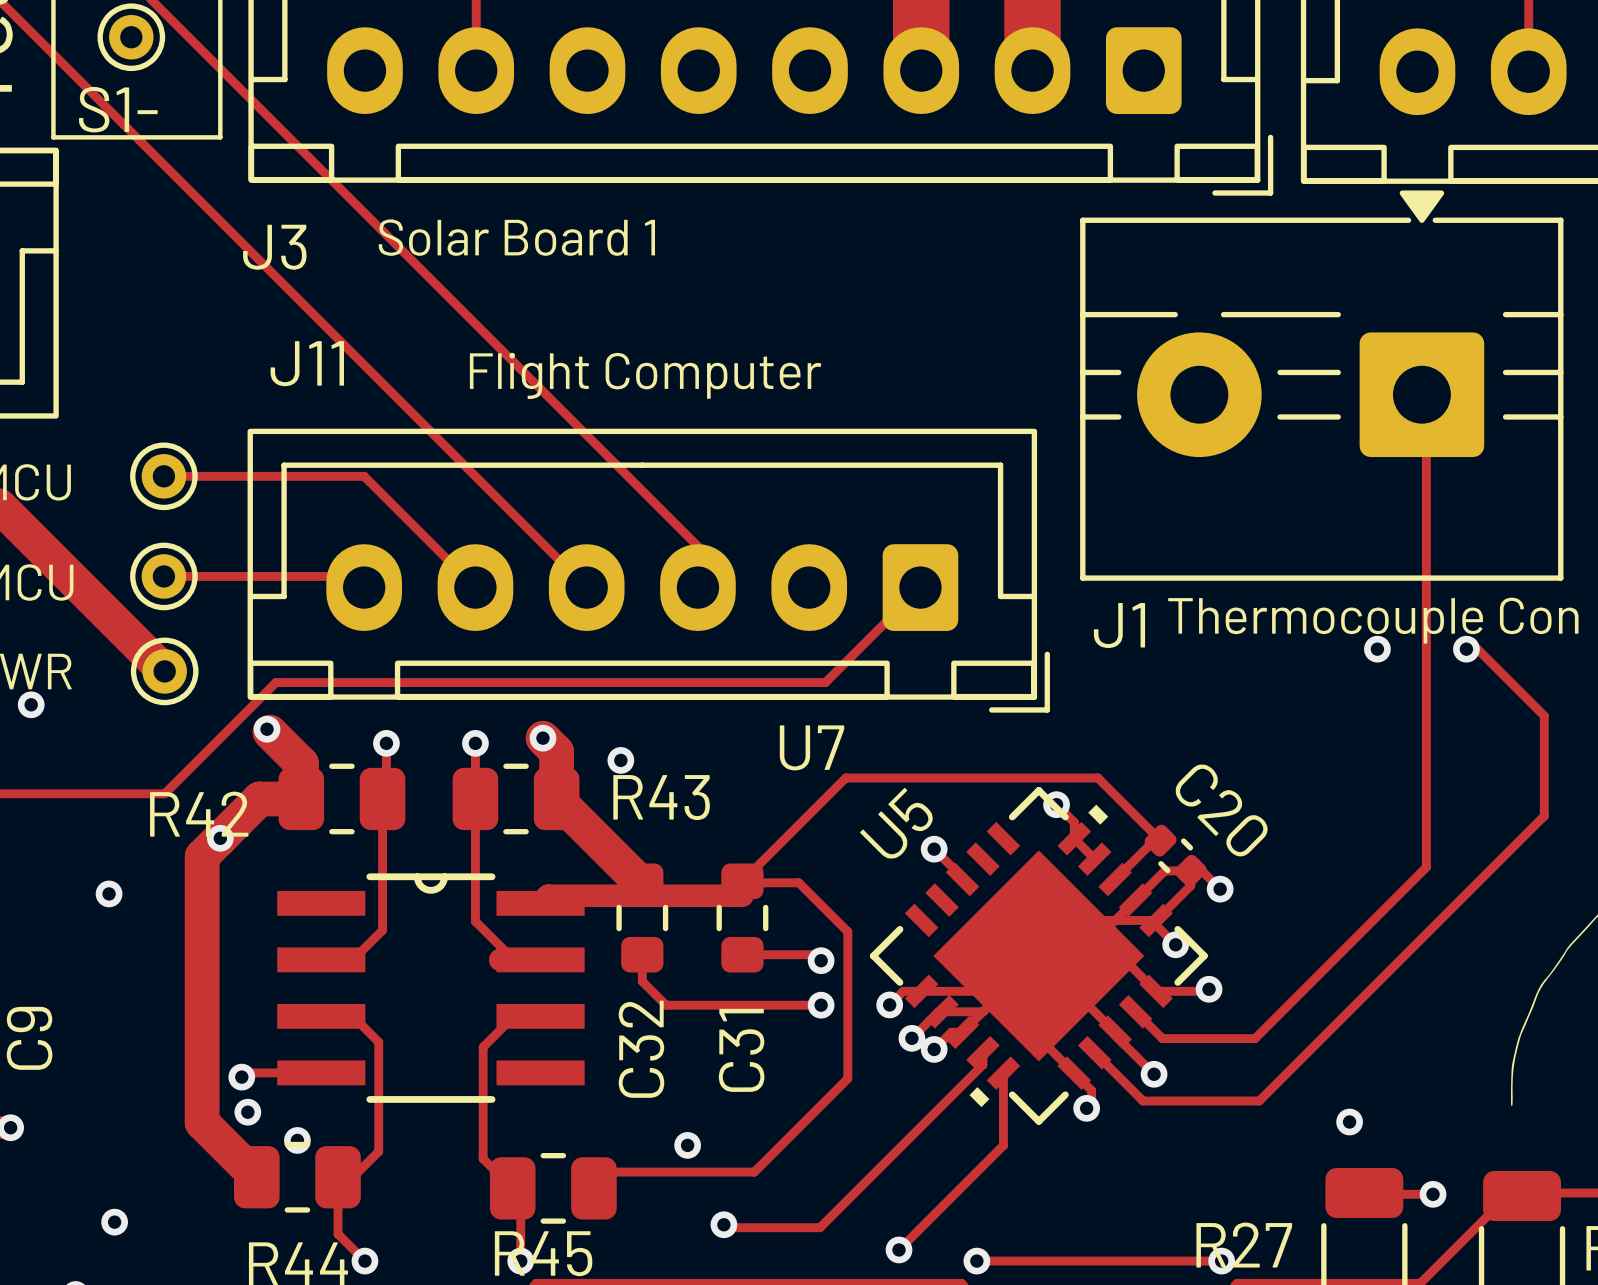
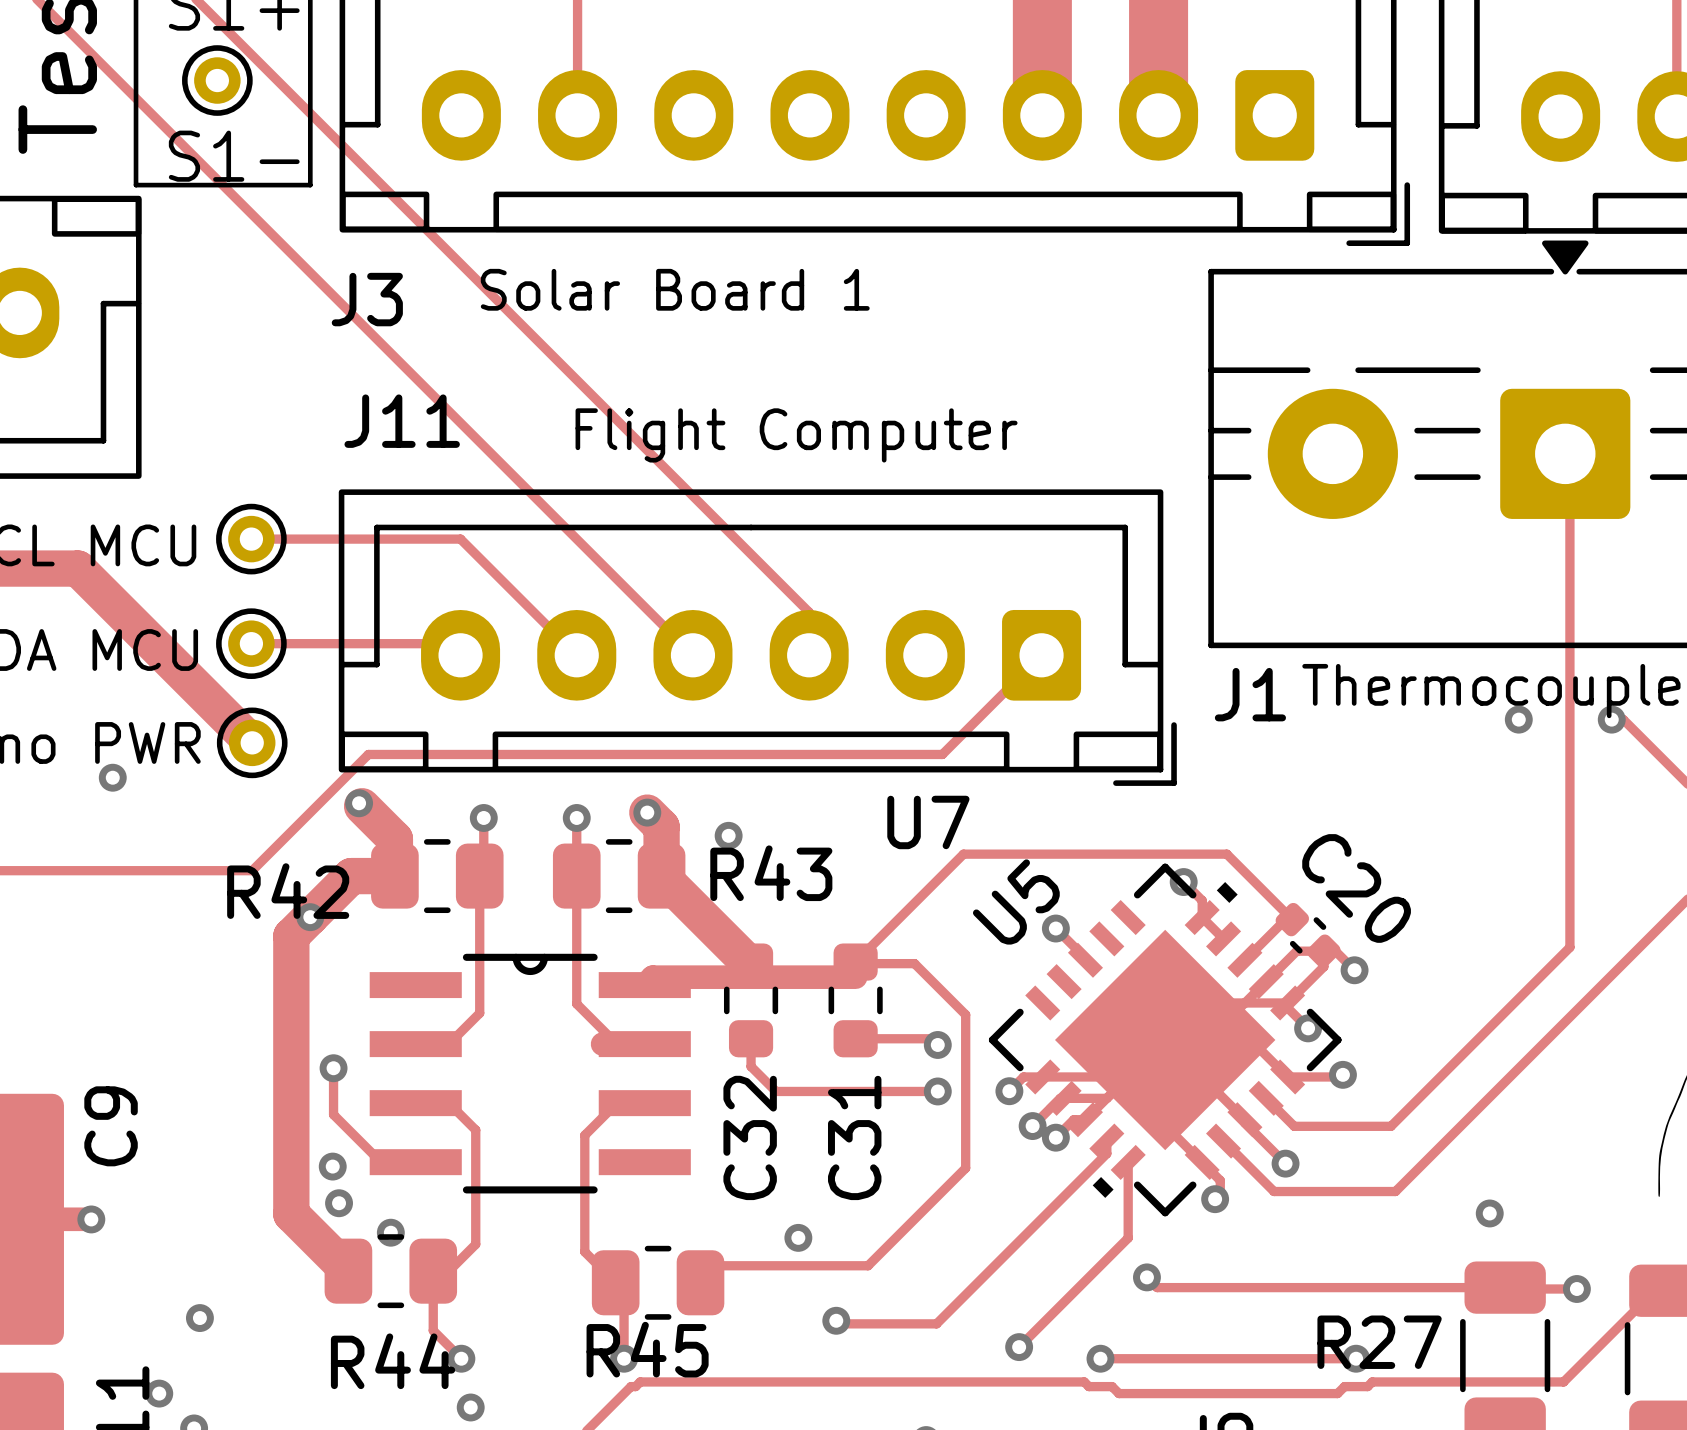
via position: (109, 893) -> (333, 1068)
track: (246, 1072) (288, 1072) -> (333, 1068) (333, 1114) (381, 1162)
track: none -> (1146, 1277) (1157, 1287) (1505, 1287)
via: none -> (1146, 1277)

